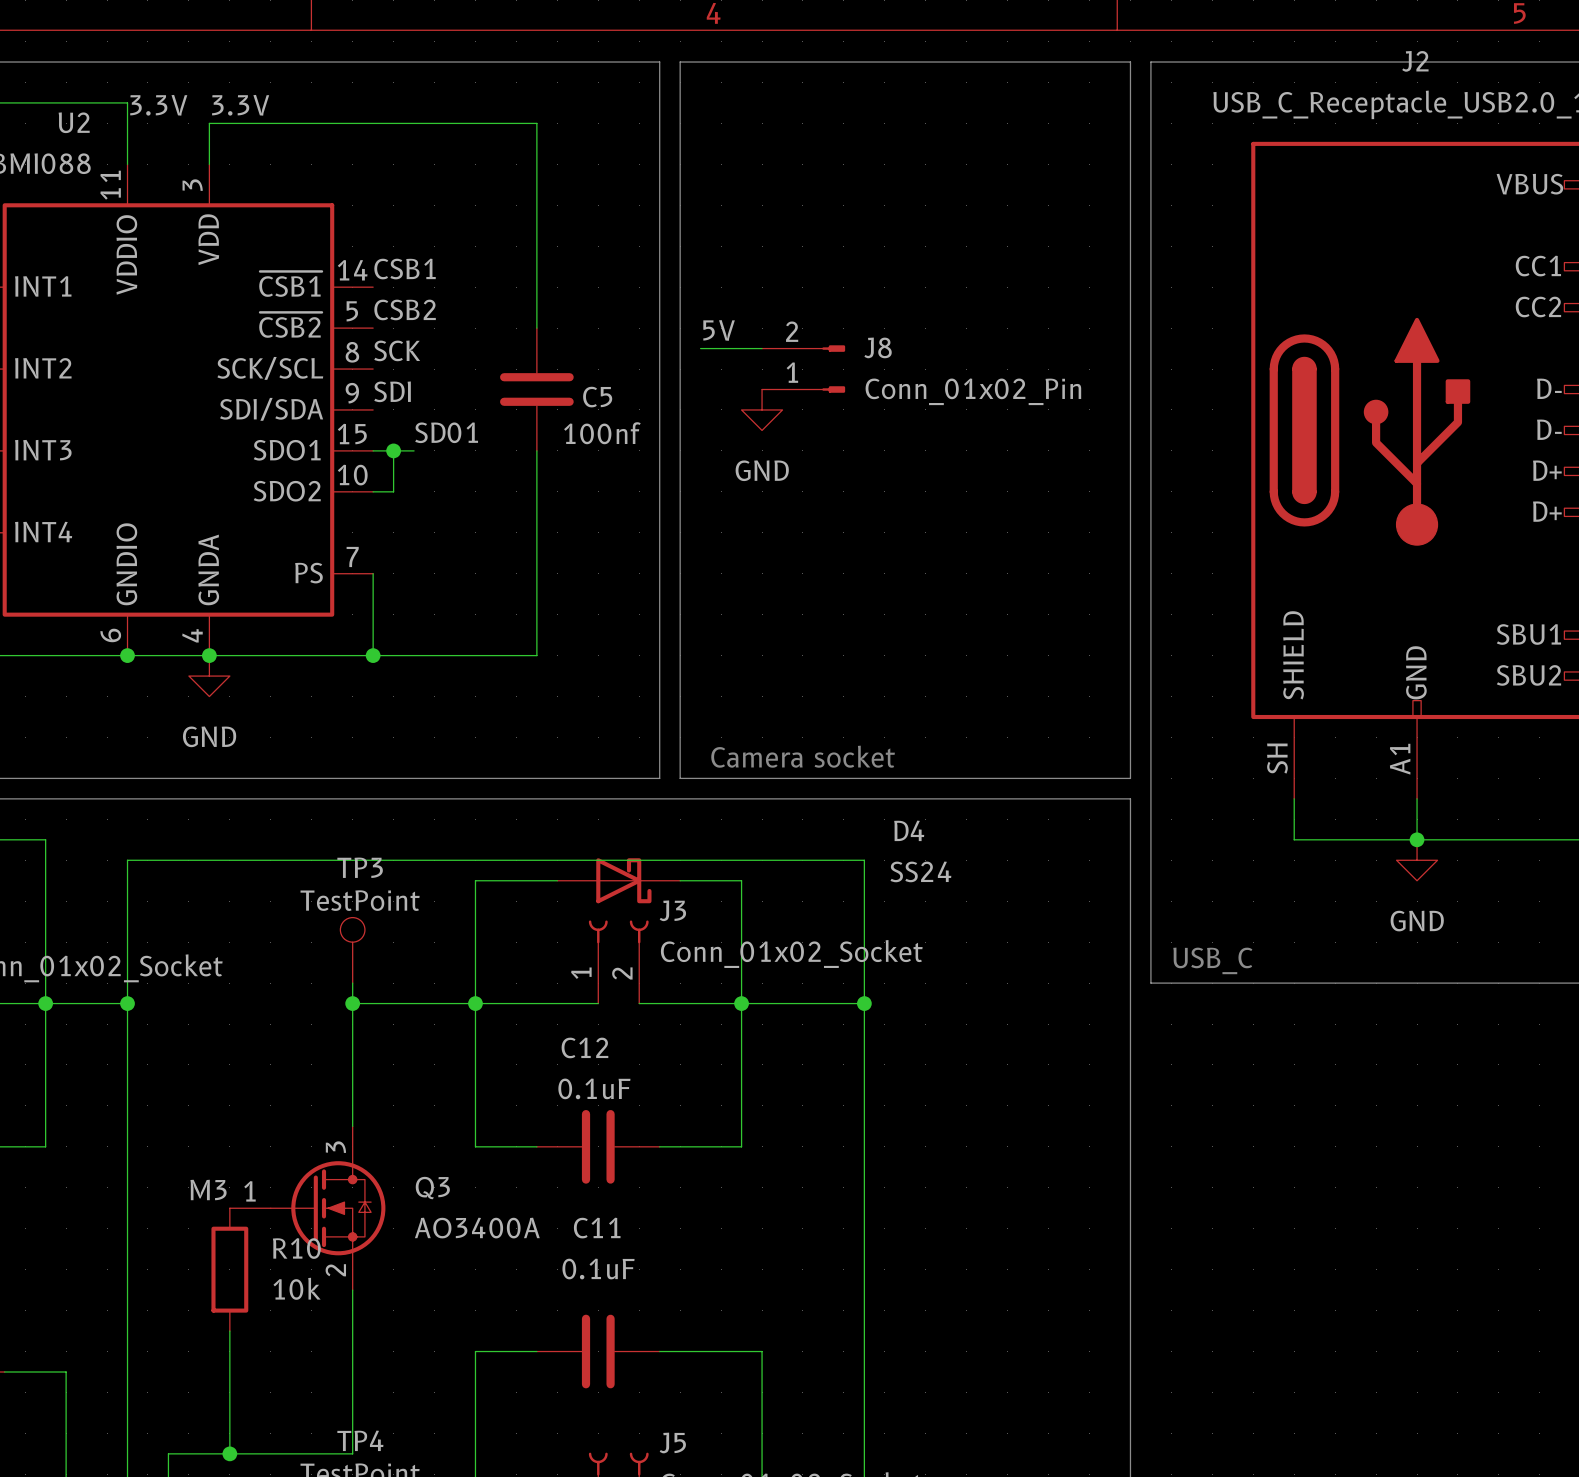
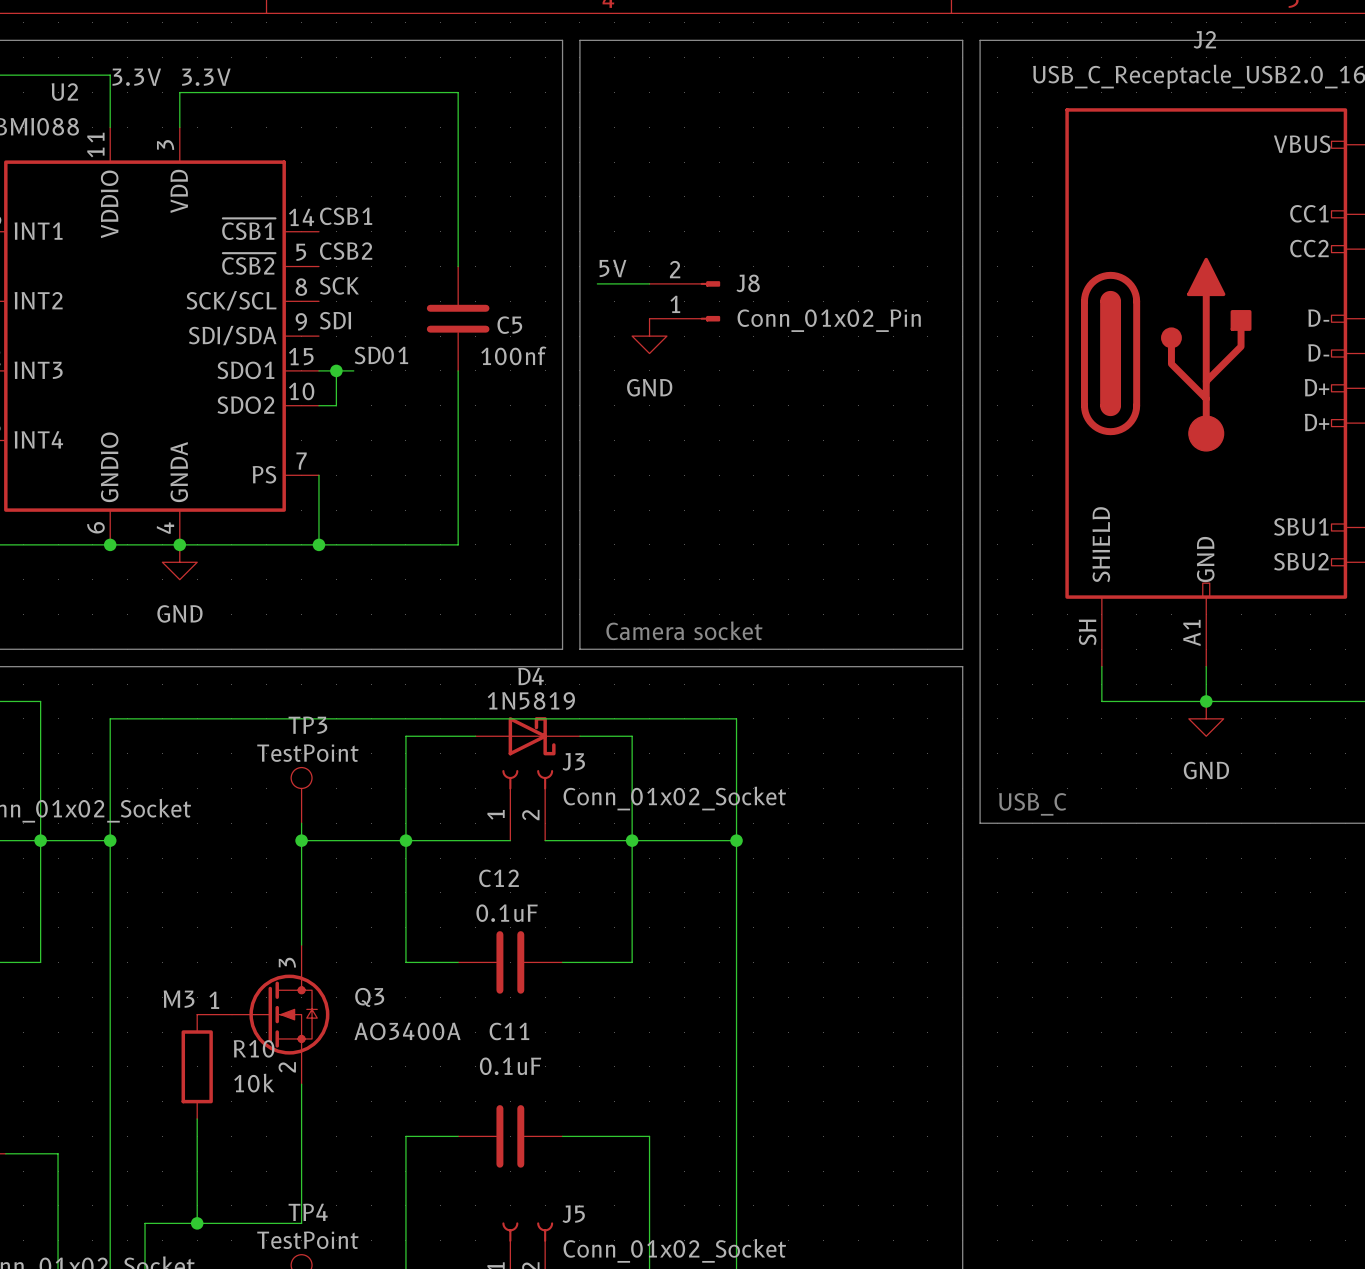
D4 name position: D4 (909, 830) -> D4 (531, 676)
D4 value: SS24 (920, 871) -> 1N5819 (531, 700)

